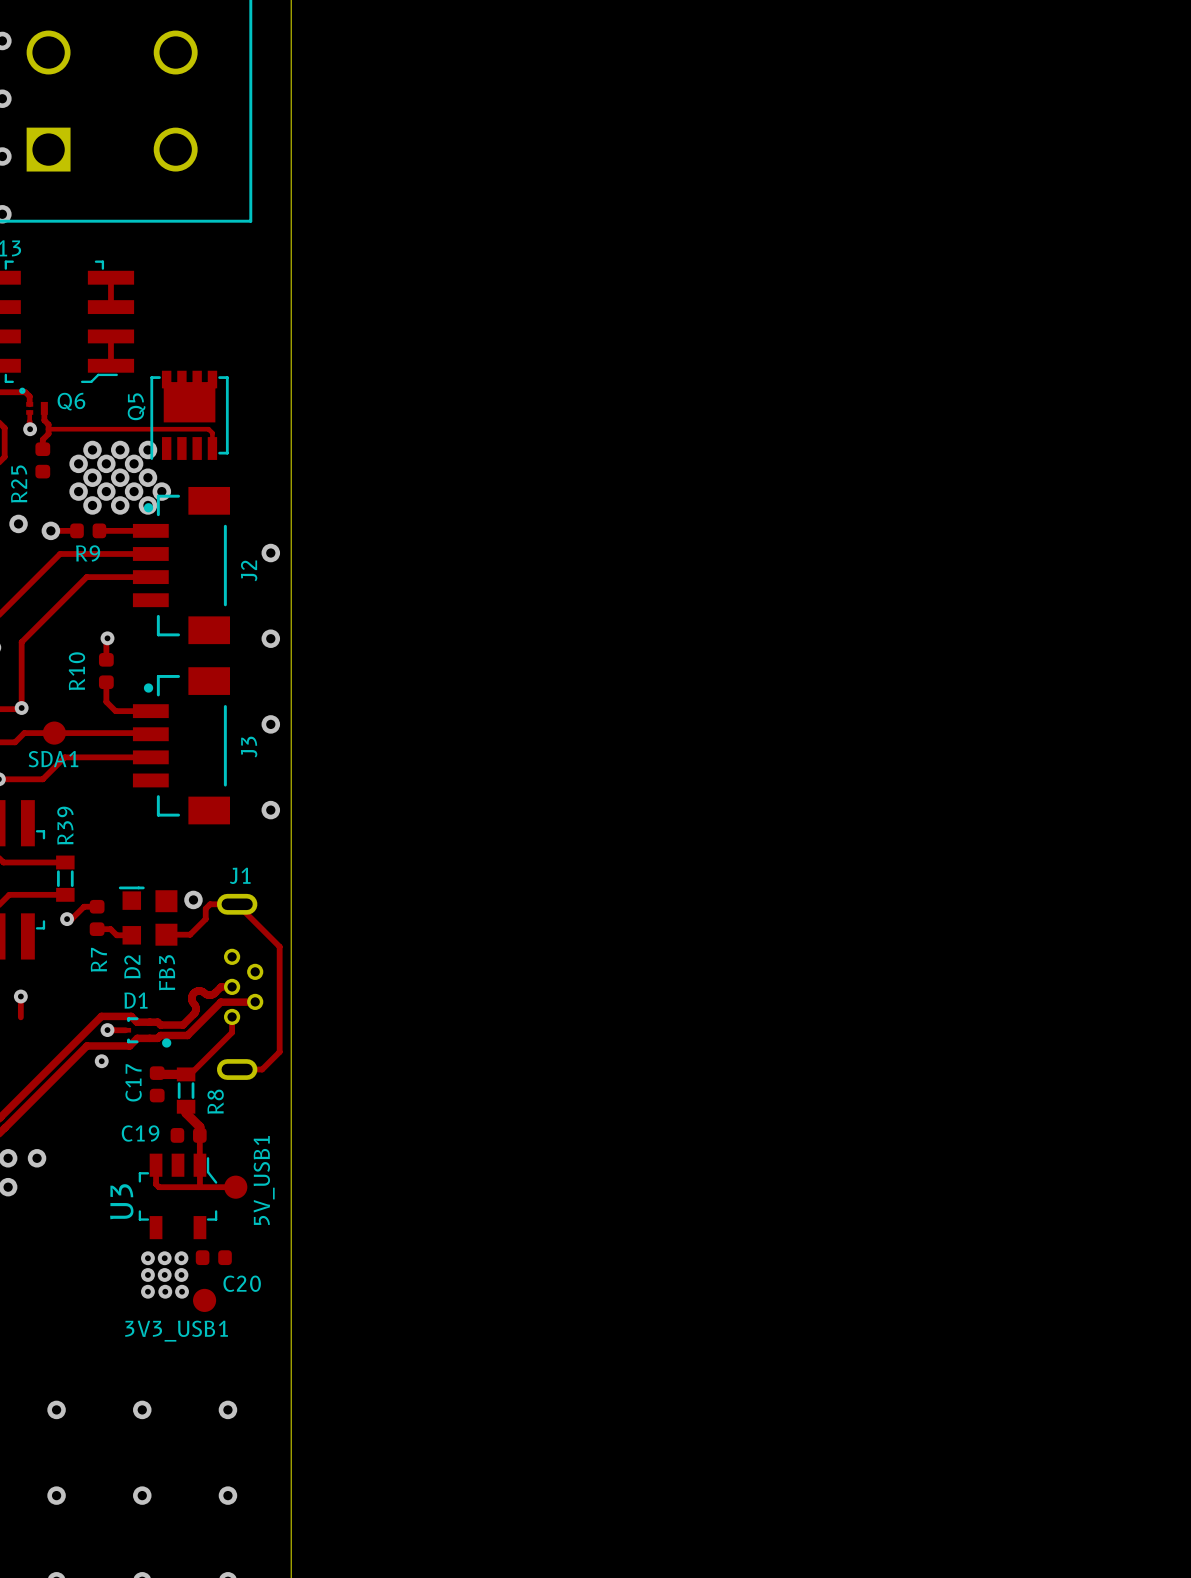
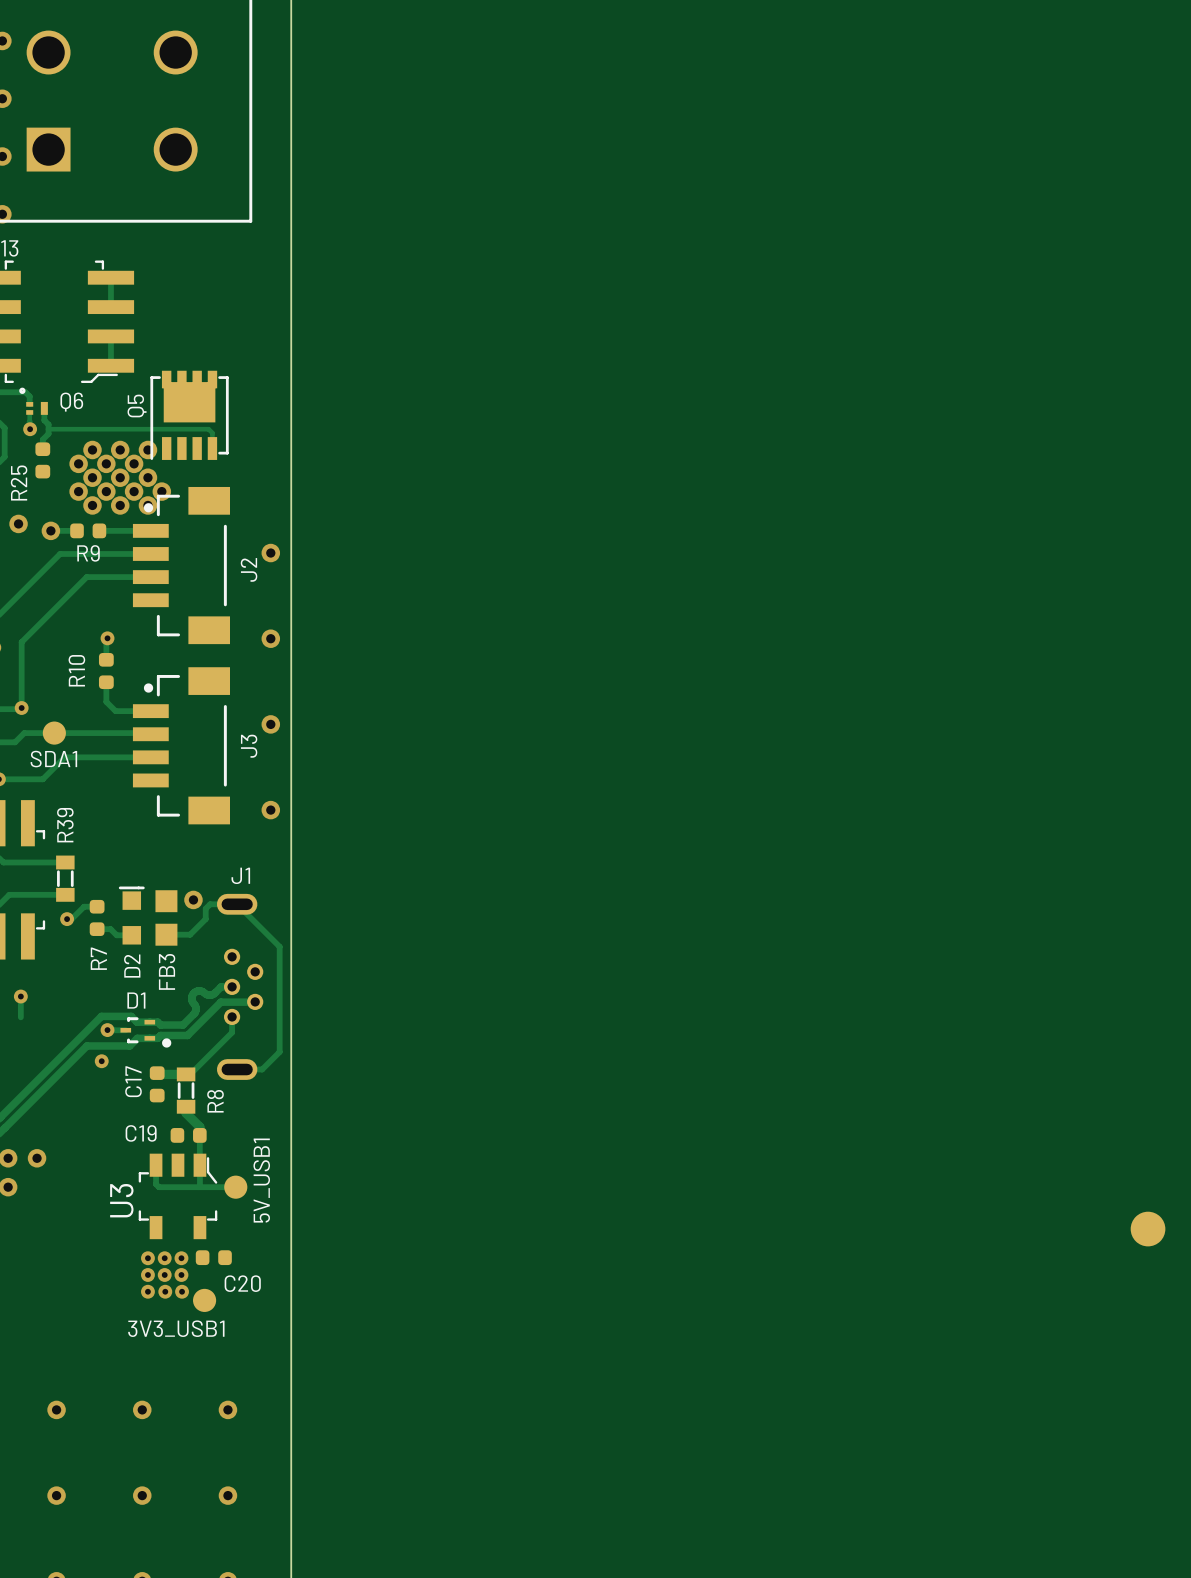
part: none -> (1148, 1229)

